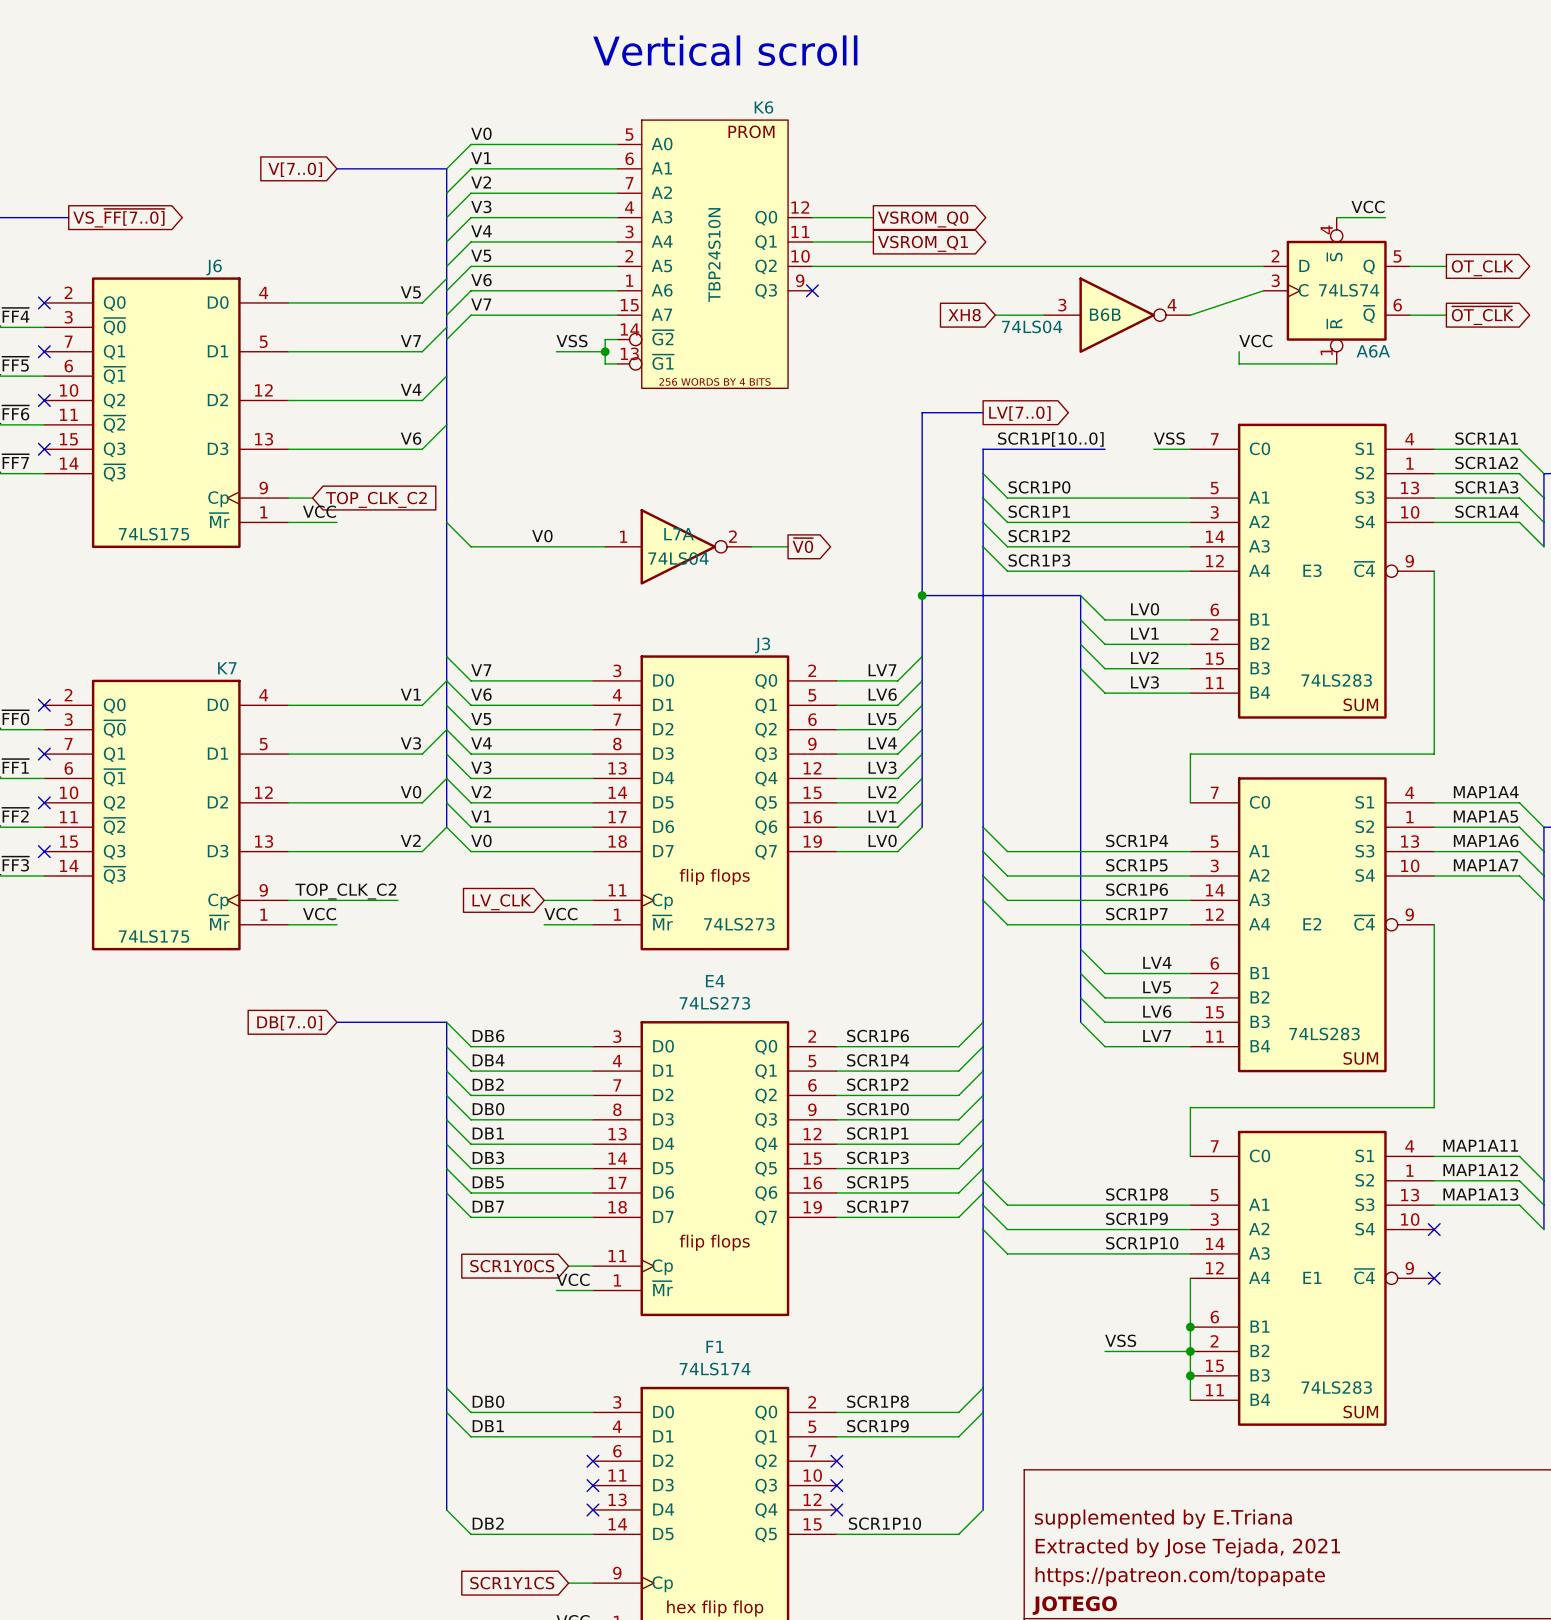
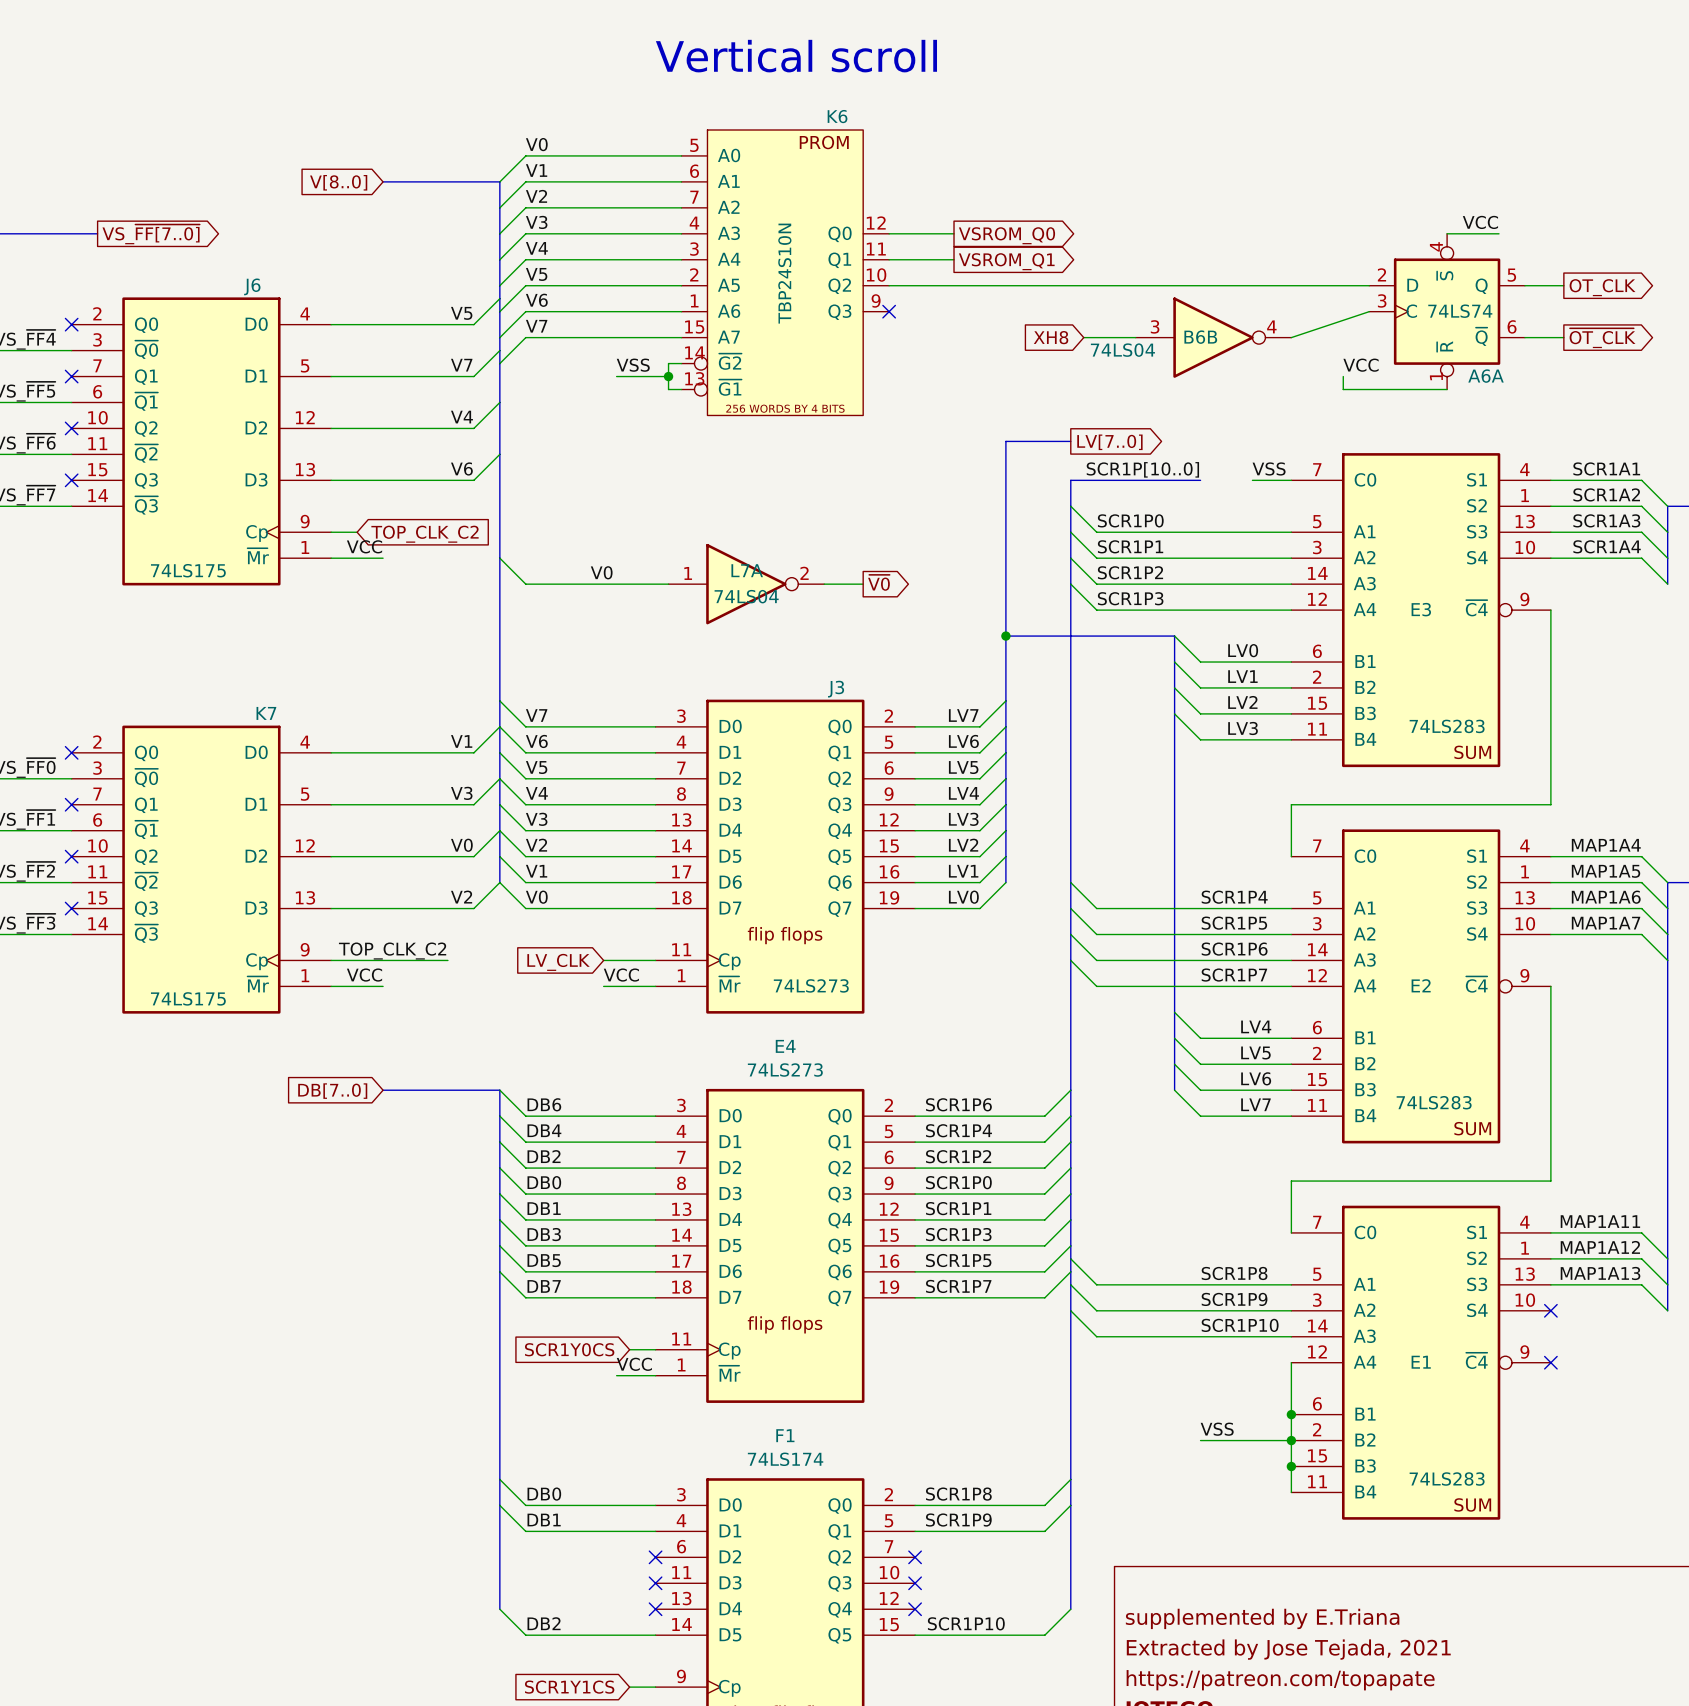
global label: V[7..0] (295, 169) -> V[8..0] (338, 182)

